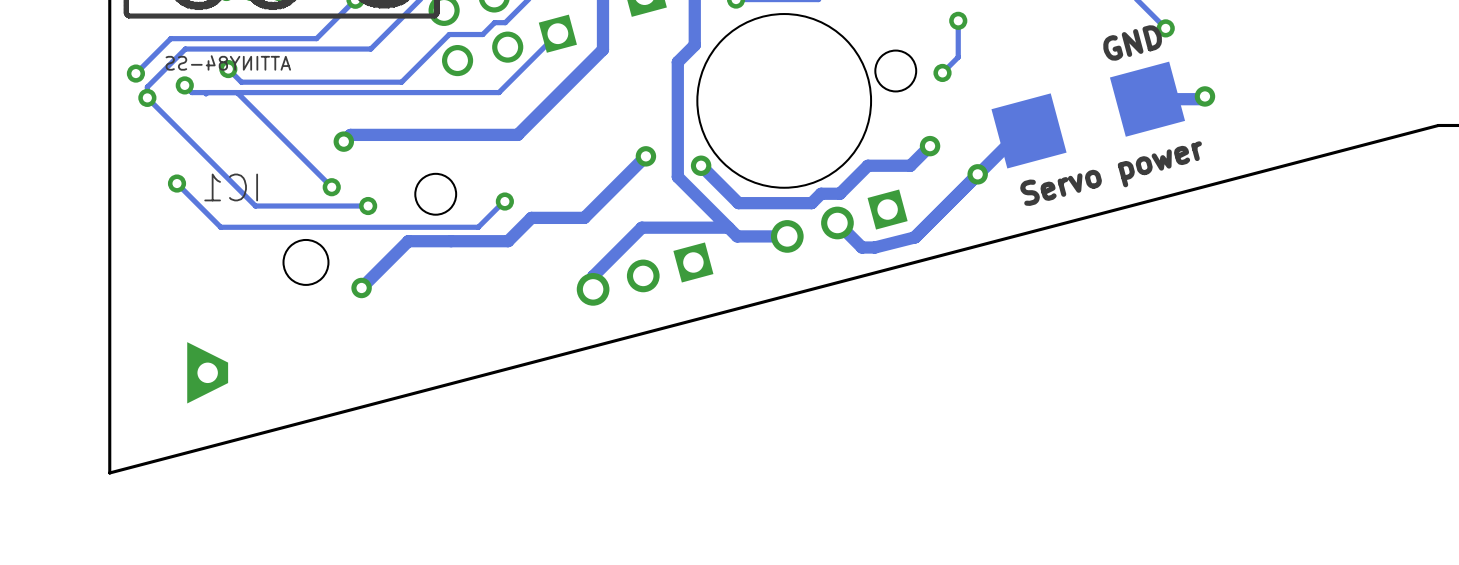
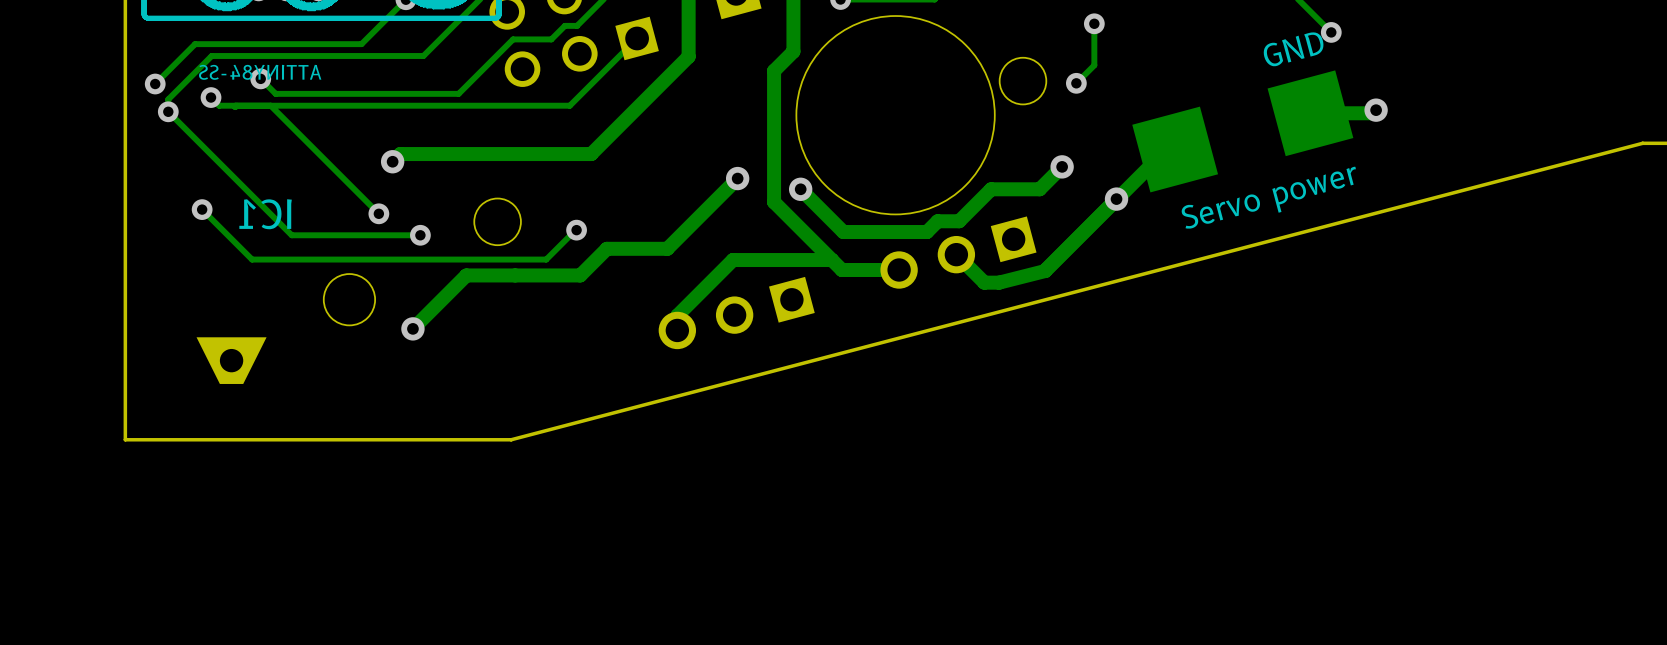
board edge: (1438, 125) (109, 472) (109, 385) -> (1642, 143) (511, 439) (125, 439)
part rotation: 0° (207, 372) -> 90° clockwise (231, 360)
part position: (207, 372) -> (231, 360)

